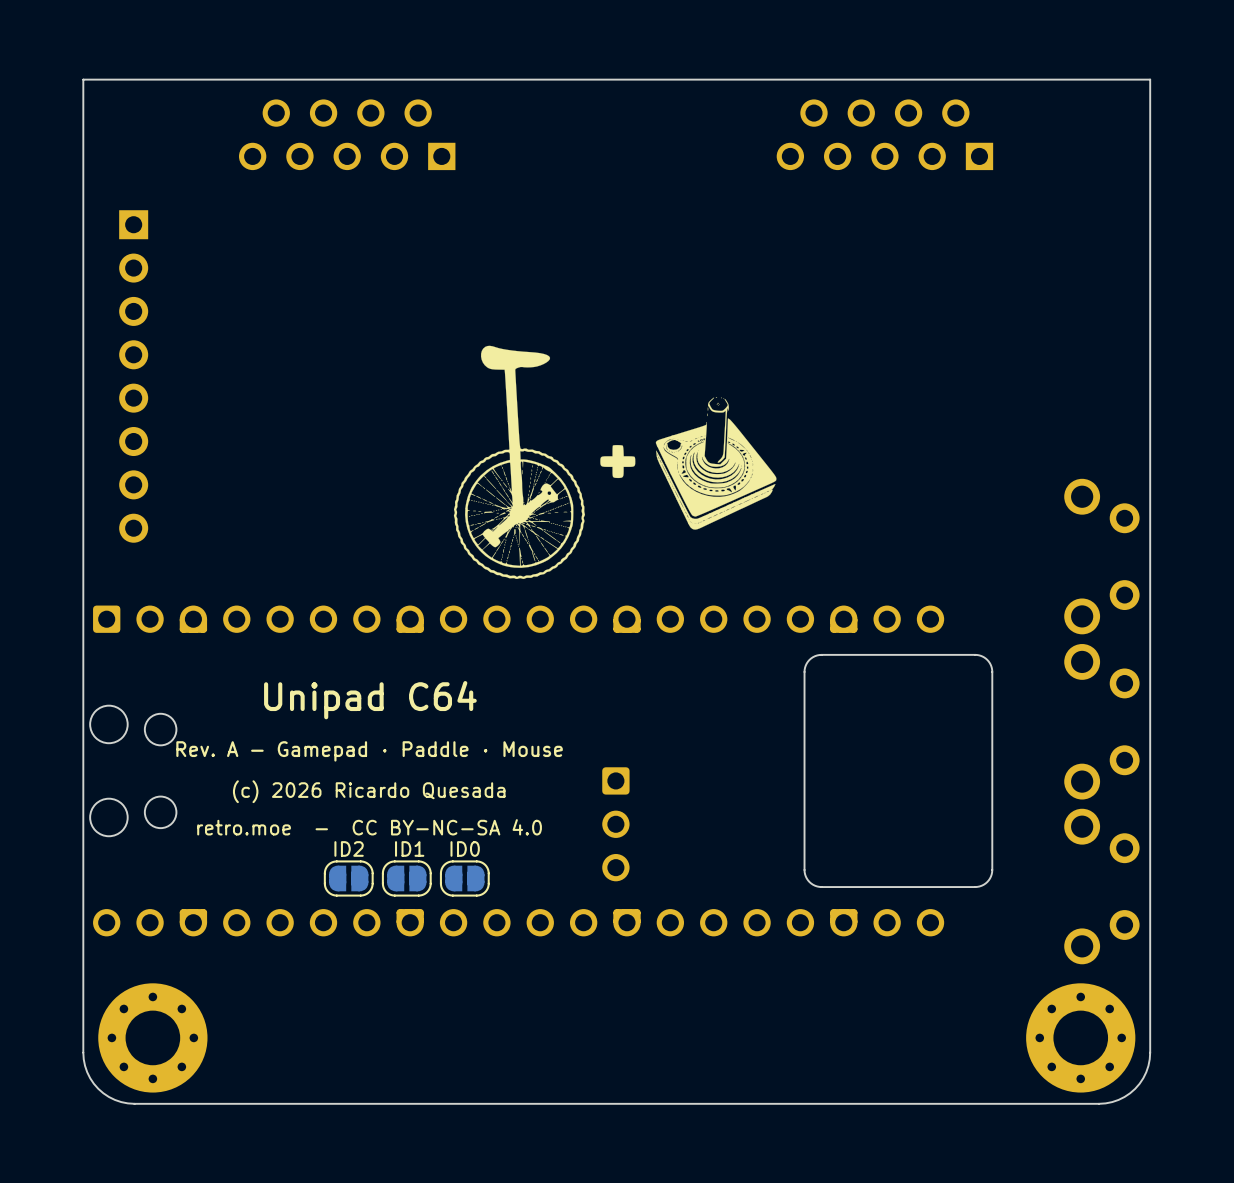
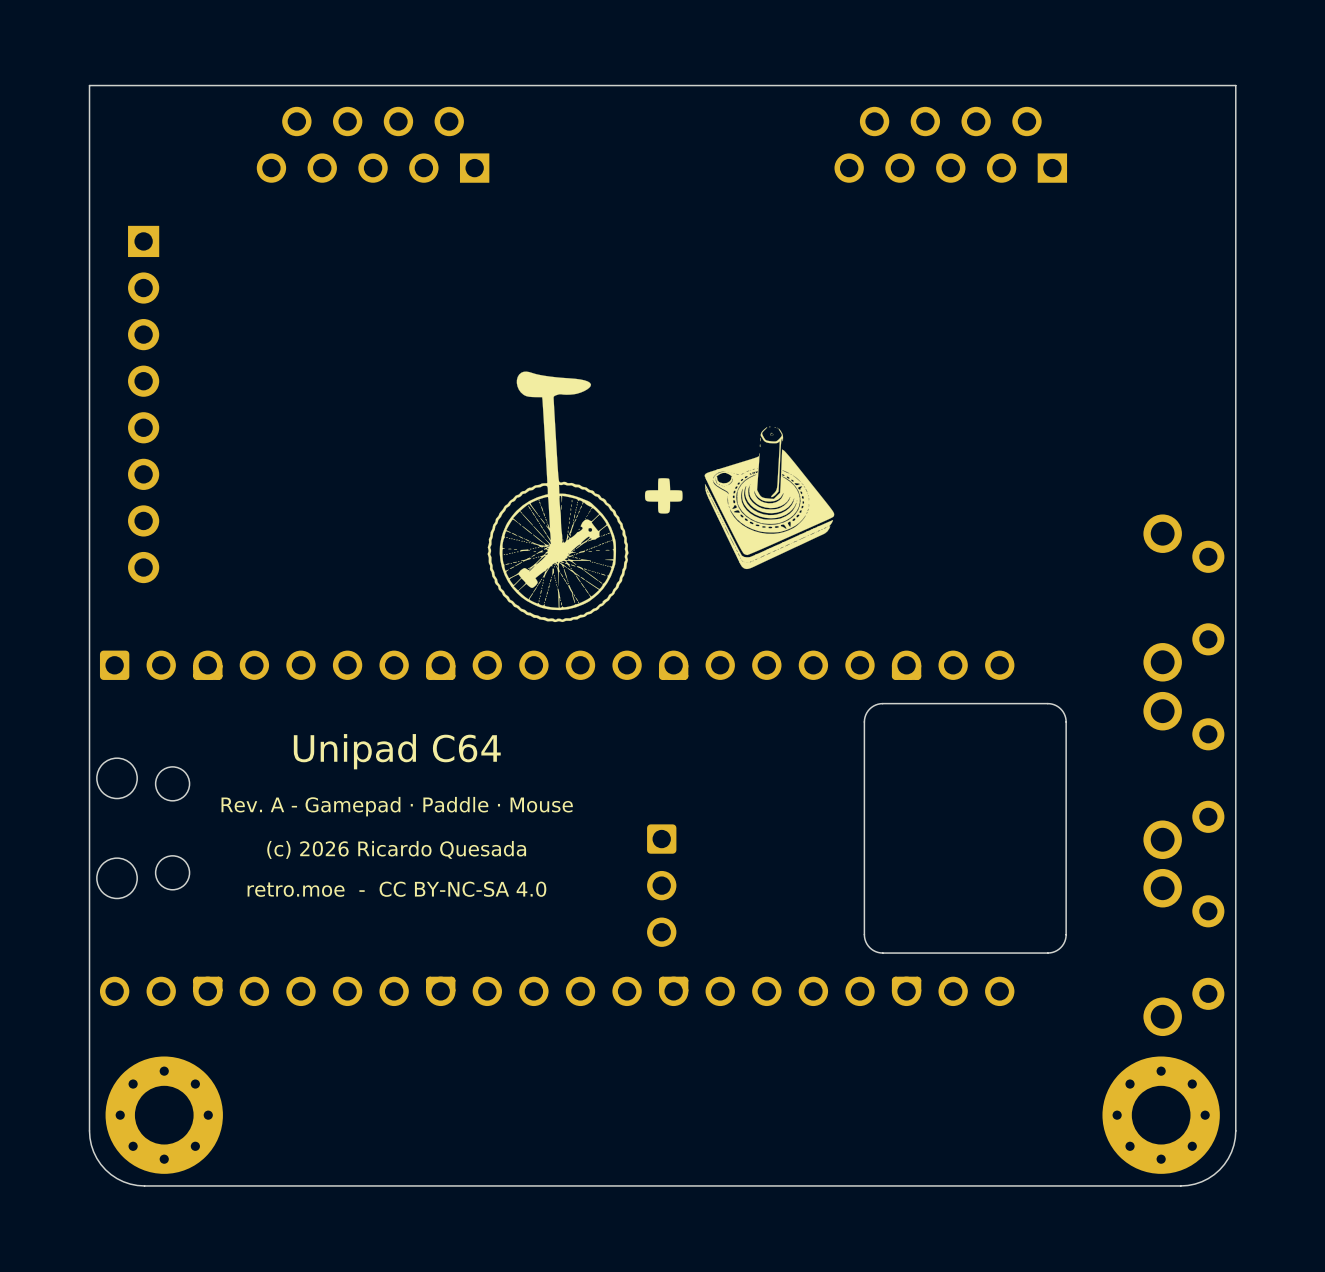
text: ID2 (349, 848) -> none
text: ID1 (409, 848) -> none
text: ID0 (465, 848) -> none
part: (348, 878) -> none
part: (406, 878) -> none
part: (464, 878) -> none

